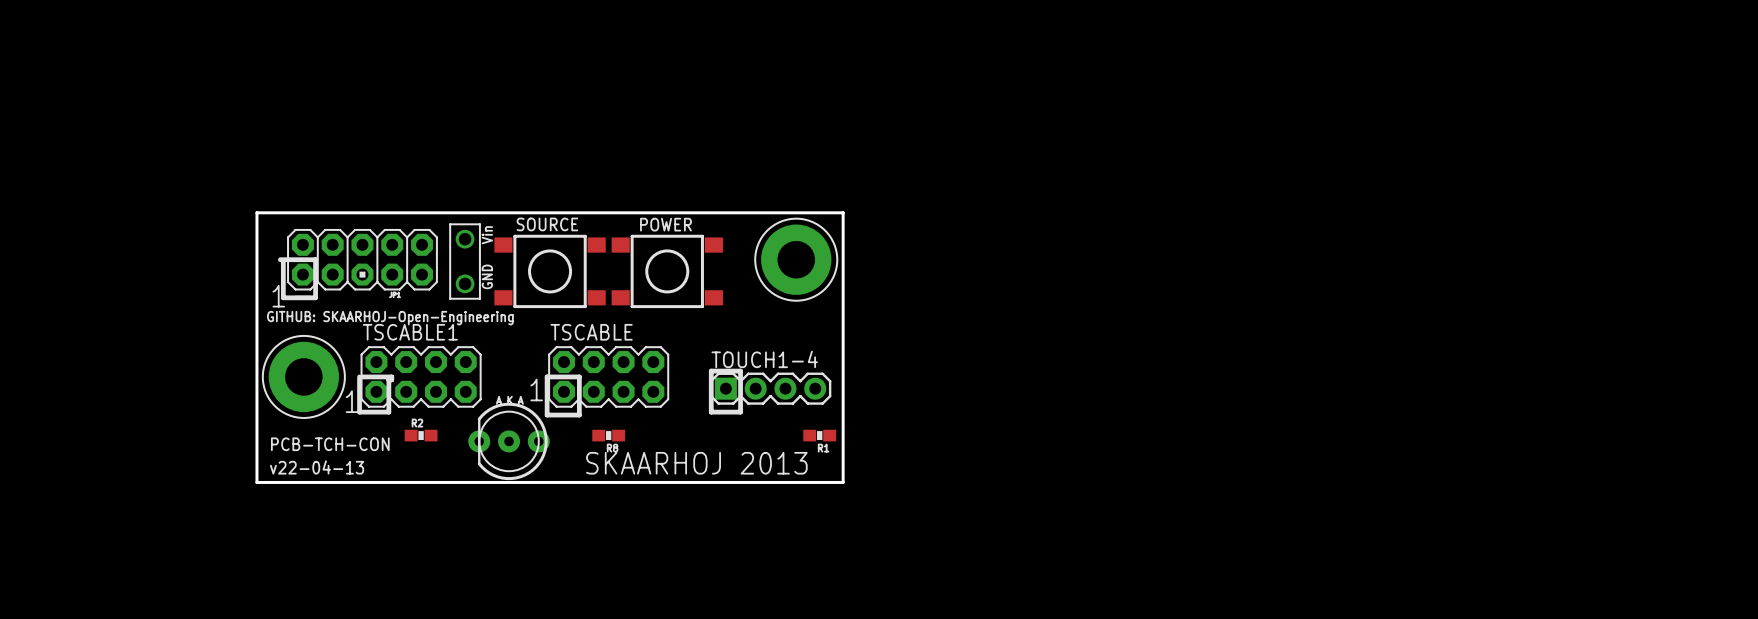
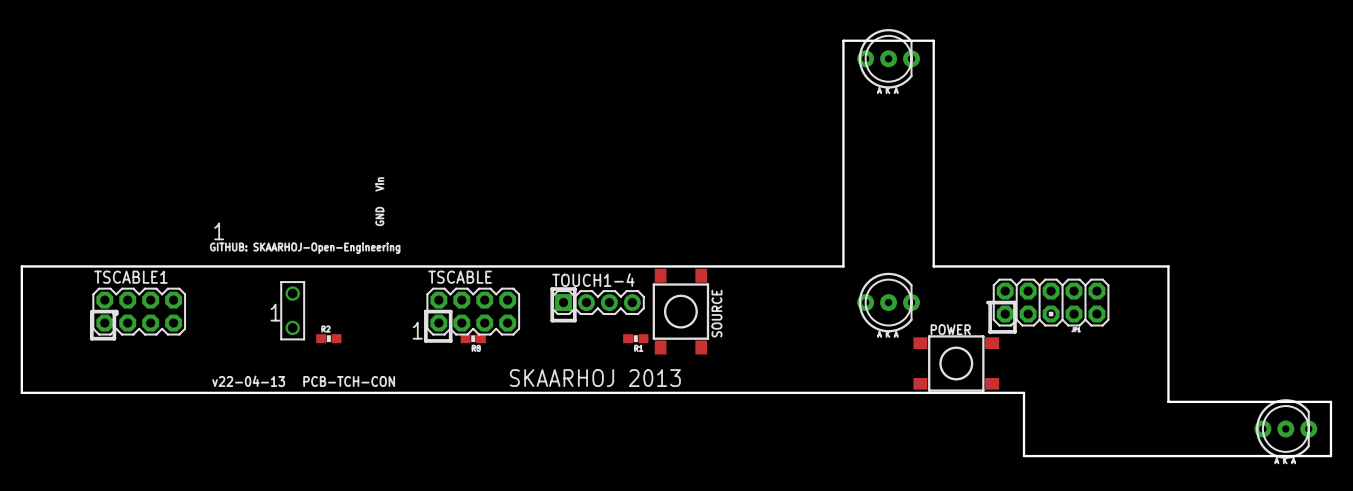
board edge: none -> (843, 40) (843, 266) (21, 266) (21, 392) (1024, 392) (1024, 456) (1330, 456) (1330, 401) (1168, 401) (1168, 266) (933, 266) (933, 40) (843, 40)
part: none -> (888, 58)
board edge: (256, 212) (843, 212) (843, 482) (256, 482) (256, 212) -> none
text: SOURCE (547, 224) -> none
text: POWER (665, 224) -> none
line: (280, 259) (315, 259) (315, 297) (283, 297) (283, 262) -> none
part: (796, 259) -> none
part position: (465, 261) -> (292, 310)
part position: (362, 263) -> (1051, 305)
part: (550, 271) -> none
part: (667, 271) -> none
part: (303, 376) -> none
line: (359, 376) (359, 412) (388, 412) (388, 379) (391, 379) (391, 376) (362, 376) -> (91, 311) (91, 338) (114, 338) (114, 313) (116, 313) (116, 311) (94, 311)
TSCABLE1 position: (421, 376) -> (139, 311)
TSCABLE position: (608, 376) -> (473, 311)
part: none -> (888, 302)
line: none -> (987, 302) (1014, 302) (1014, 331) (990, 331) (990, 304)
text position: 1 (536, 389) -> 1 (417, 330)
line: (547, 400) (547, 376) (579, 376) (579, 400) -> (425, 311) (450, 311)
part: none -> (680, 311)
text: none -> SOURCE (716, 313)
line: (547, 415) (579, 415) -> (425, 322) (425, 340) (450, 340) (450, 322)
text: none -> POWER (950, 329)
part: (509, 441) -> none
text position: PCB-TCH-CON (330, 444) -> PCB-TCH-CON (349, 381)
text position: SKAARHOJ 2013 (696, 463) -> SKAARHOJ 2013 (595, 378)
text position: v22-04-13 (317, 467) -> v22-04-13 (248, 381)
part: none -> (956, 363)
part: none -> (1285, 428)

